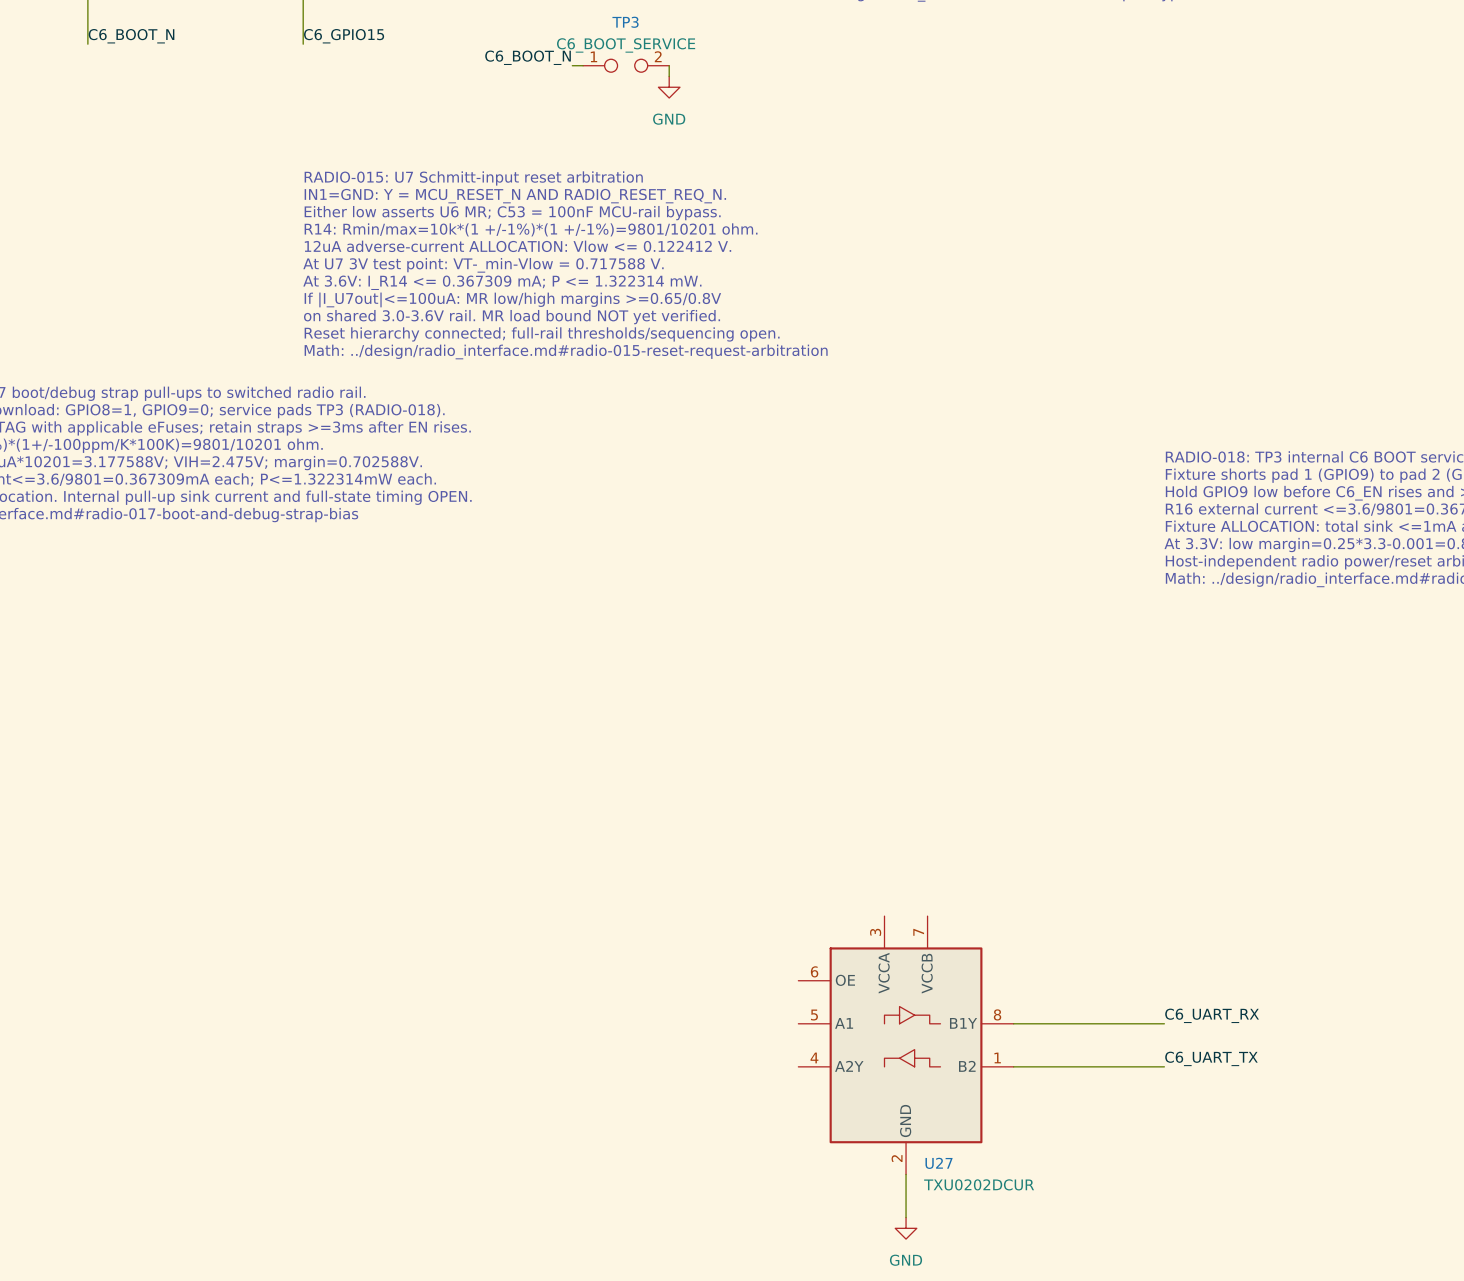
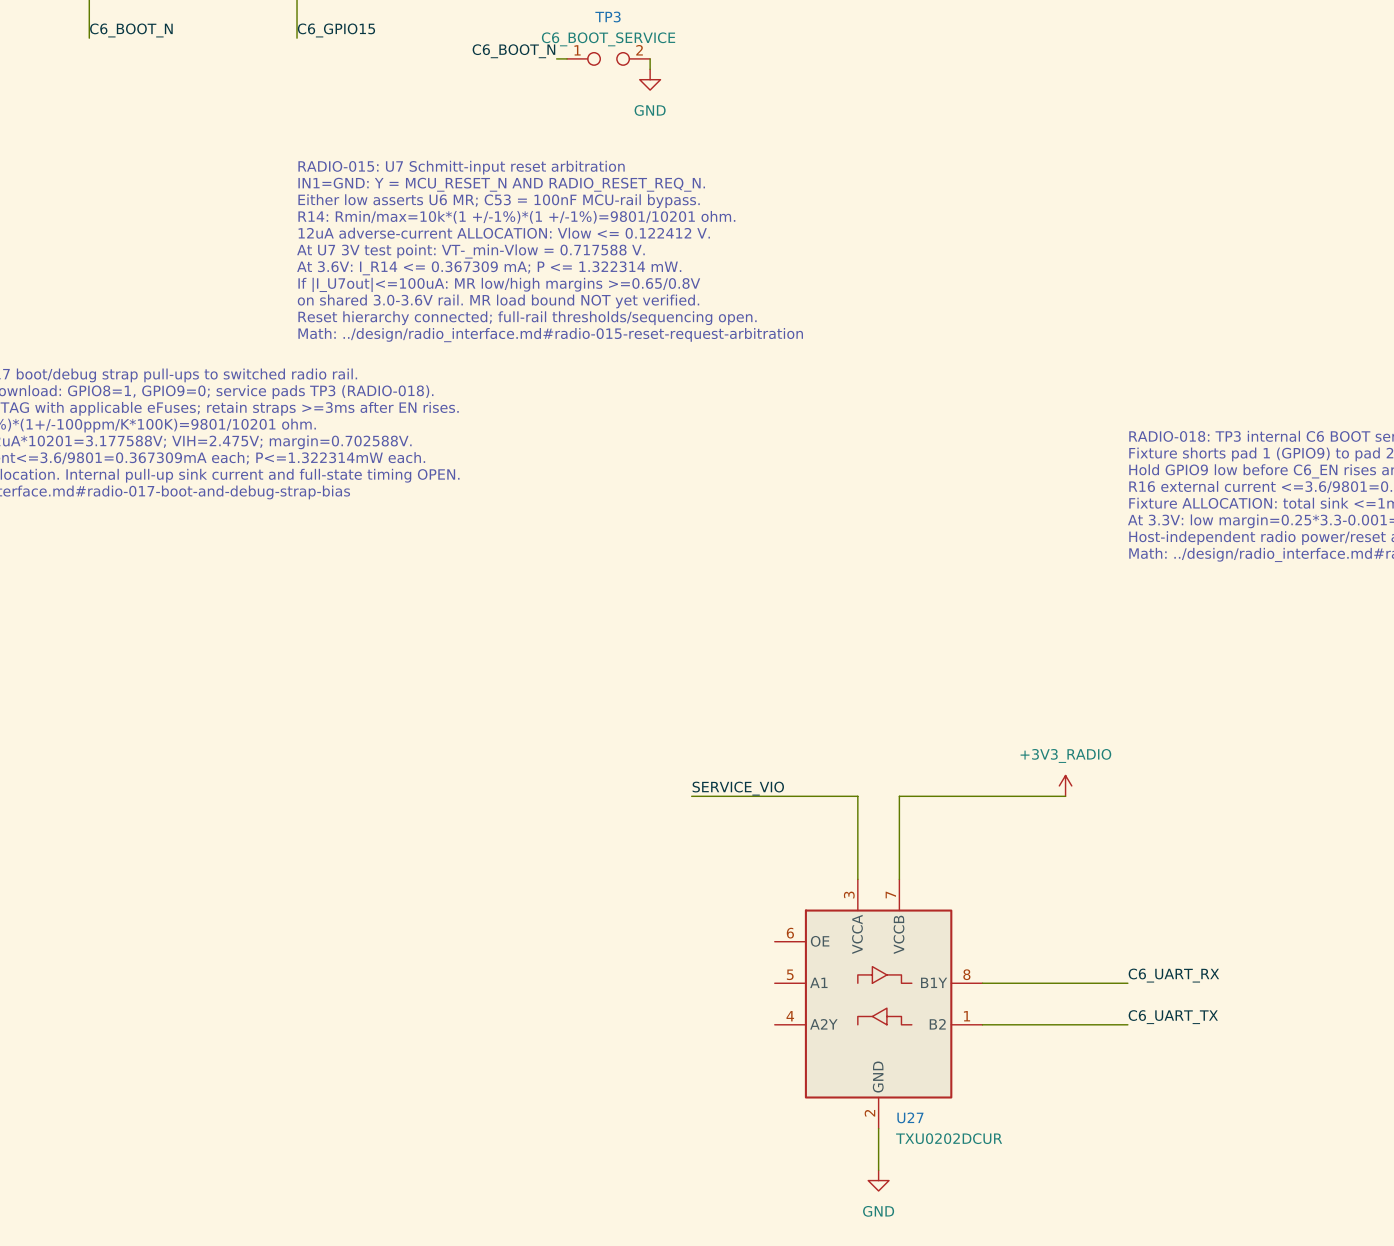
power symbol: none -> +3V3_RADIO (1065, 785)
label: none -> SERVICE_VIO (738, 788)
wire: none -> (691, 796) (857, 796) (857, 879)
wire: none -> (1065, 796) (899, 796) (899, 879)

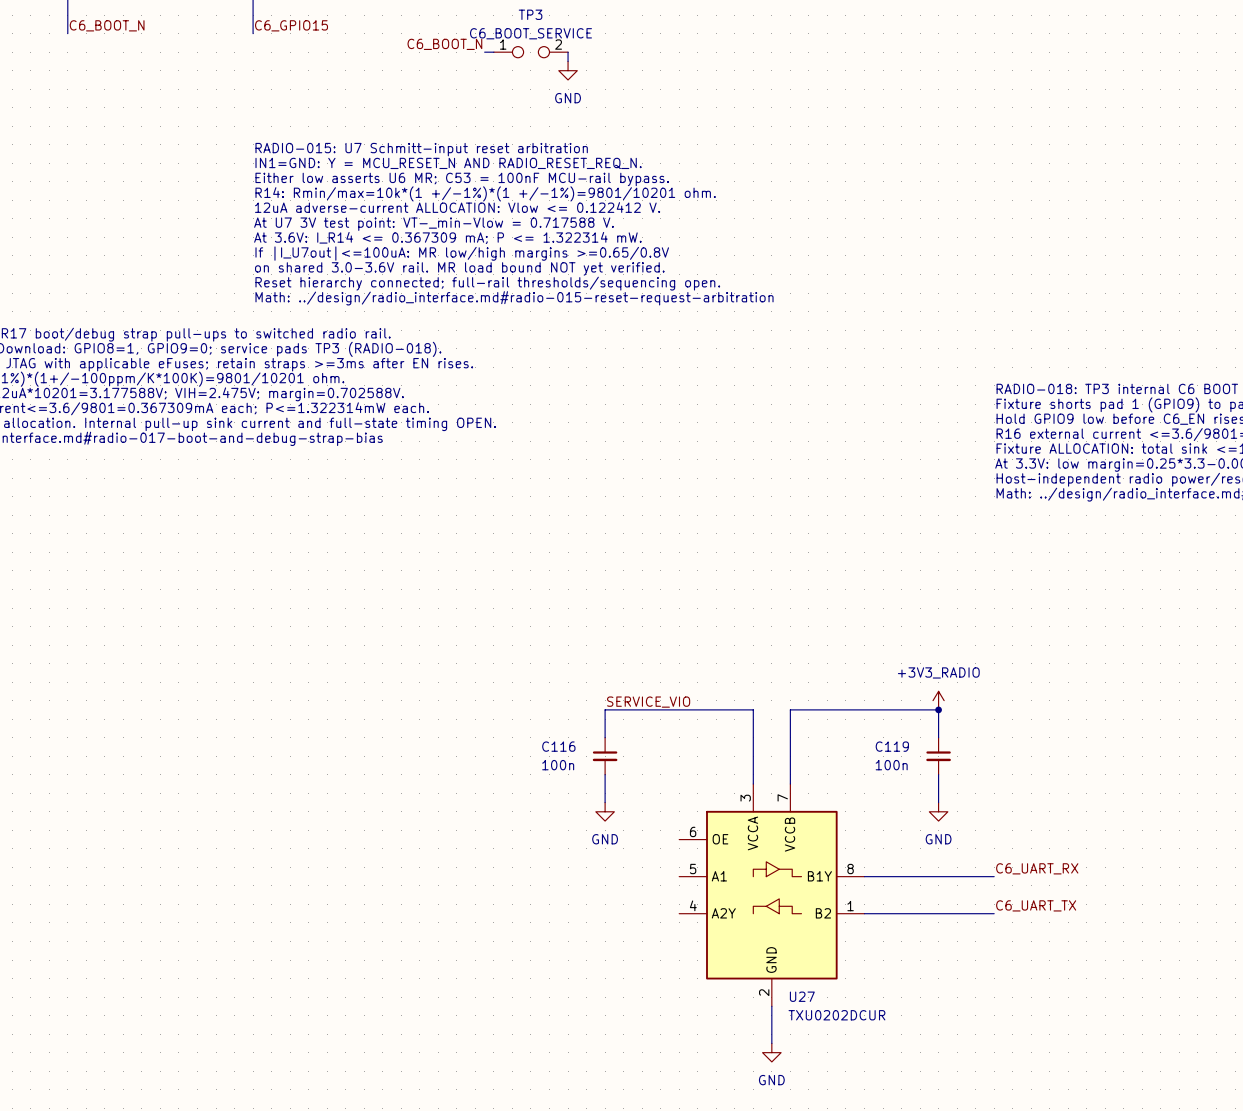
wire: none -> (605, 709) (605, 737)
wire: none -> (938, 709) (938, 737)
junction: none -> (938, 709)
C116: none -> 100n (605, 756)
C119: none -> 100n (938, 756)
wire: none -> (605, 774) (605, 802)
wire: none -> (938, 774) (938, 802)
power symbol: none -> GND (605, 811)
power symbol: none -> GND (938, 811)

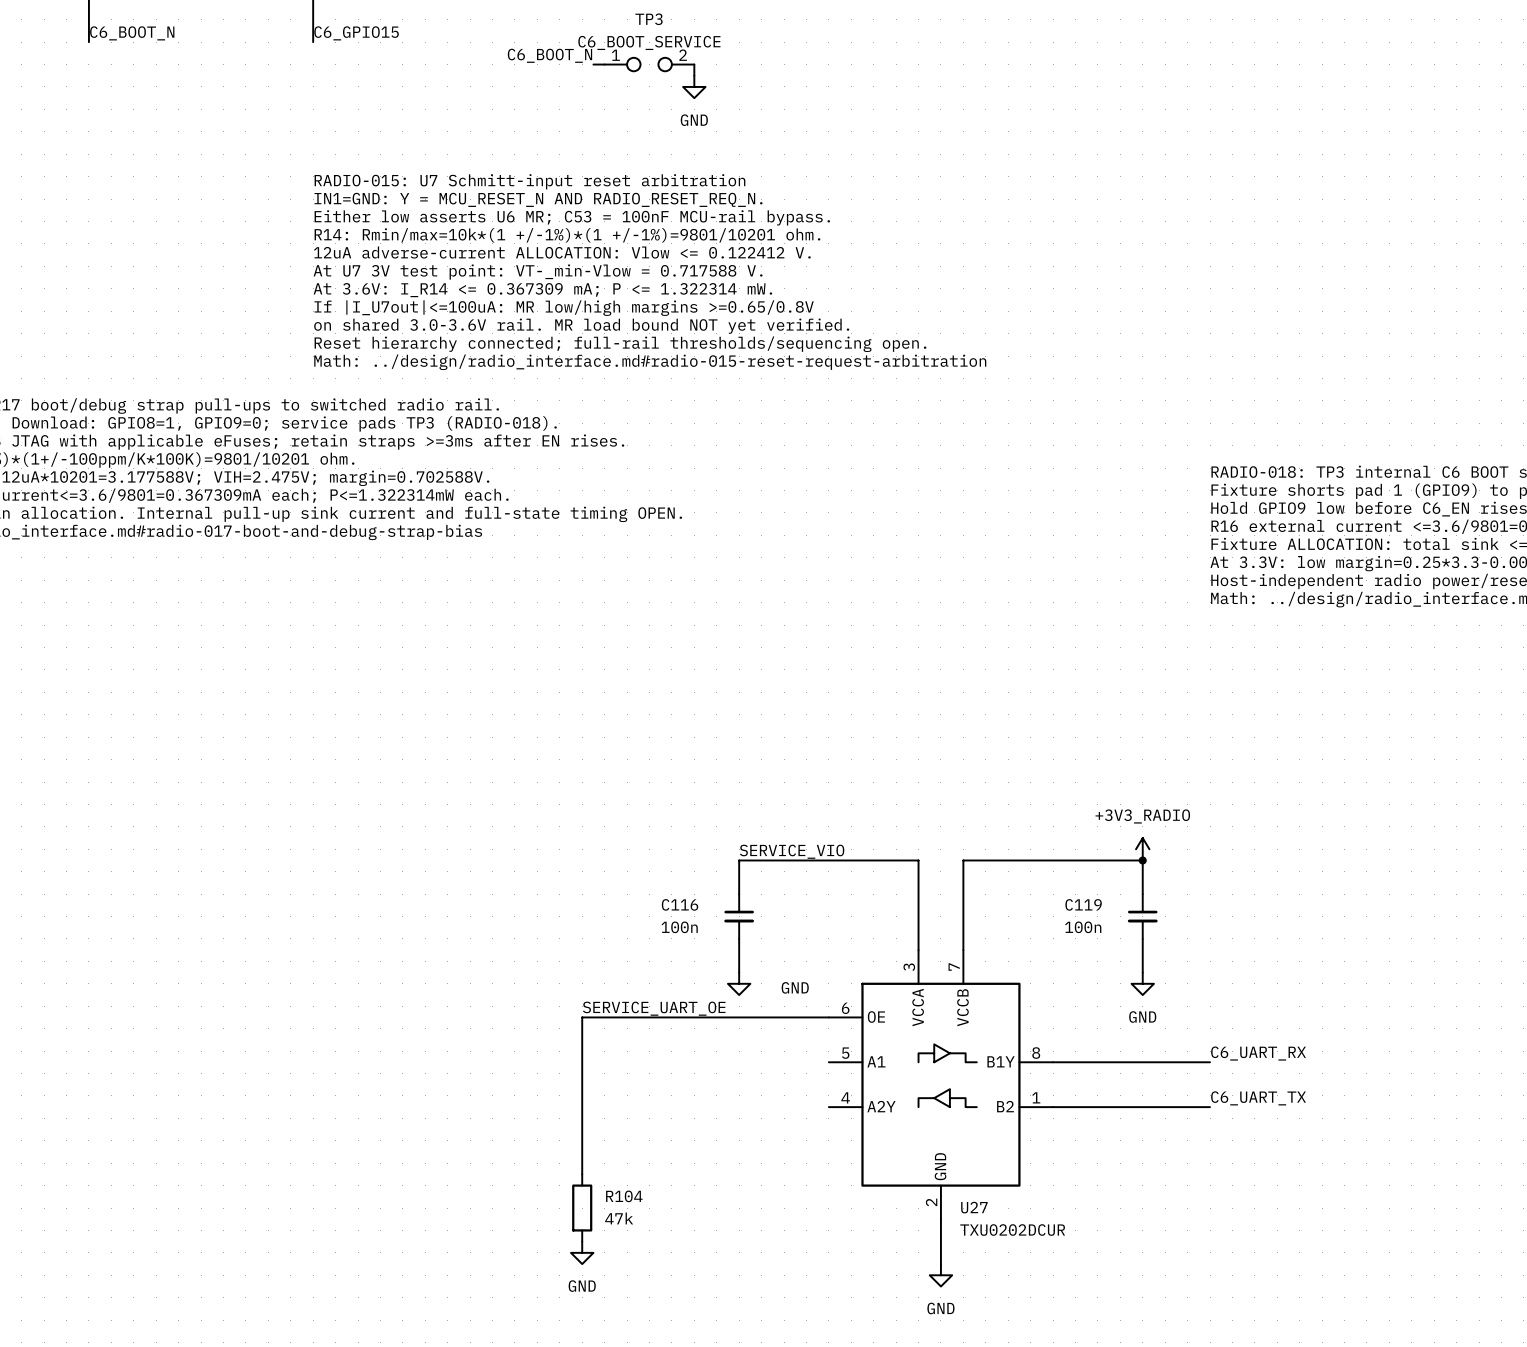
label: none -> SERVICE_UART_OE (654, 1008)
power symbol text position: GND (605, 839) -> GND (795, 987)
wire: none -> (828, 1017) (582, 1017) (582, 1174)
R104: none -> 47k (582, 1208)
power symbol: none -> GND (582, 1252)

